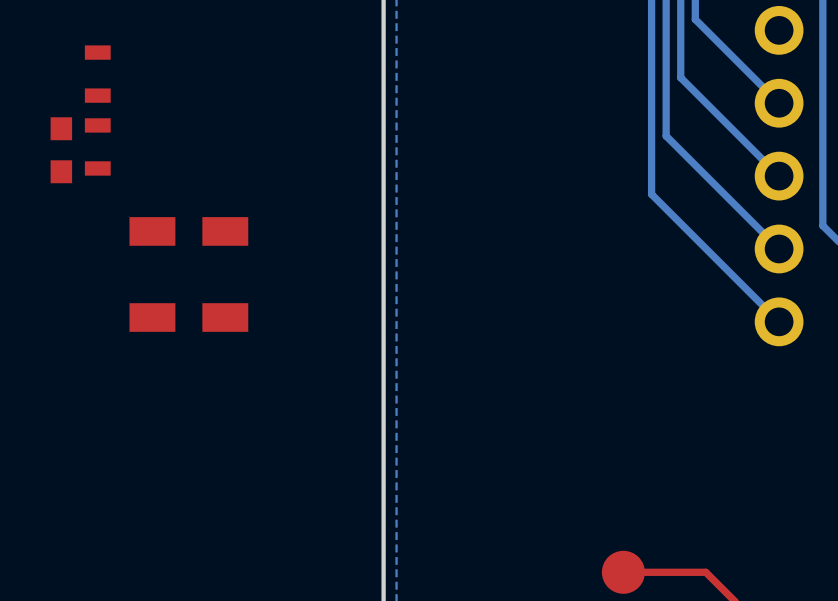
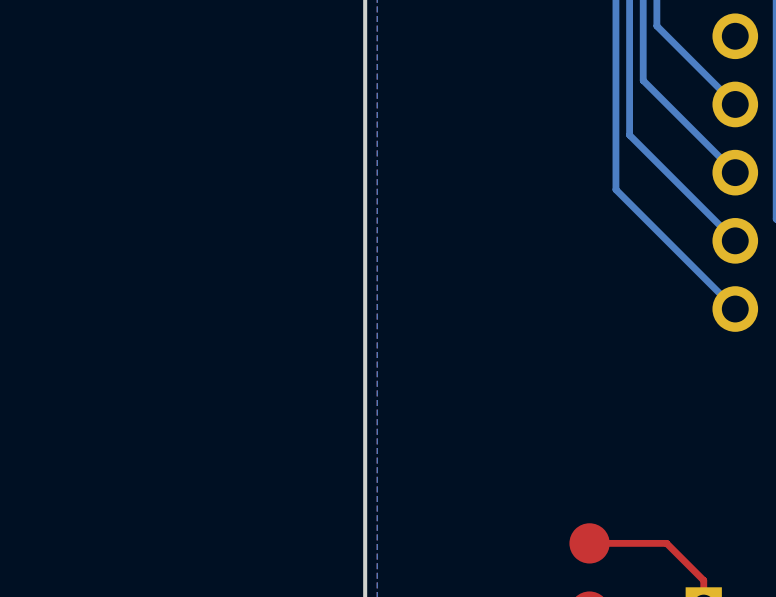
part: (97, 74) -> none
part: (97, 146) -> none
part: (61, 150) -> none
part: (152, 274) -> none
part: (225, 274) -> none

